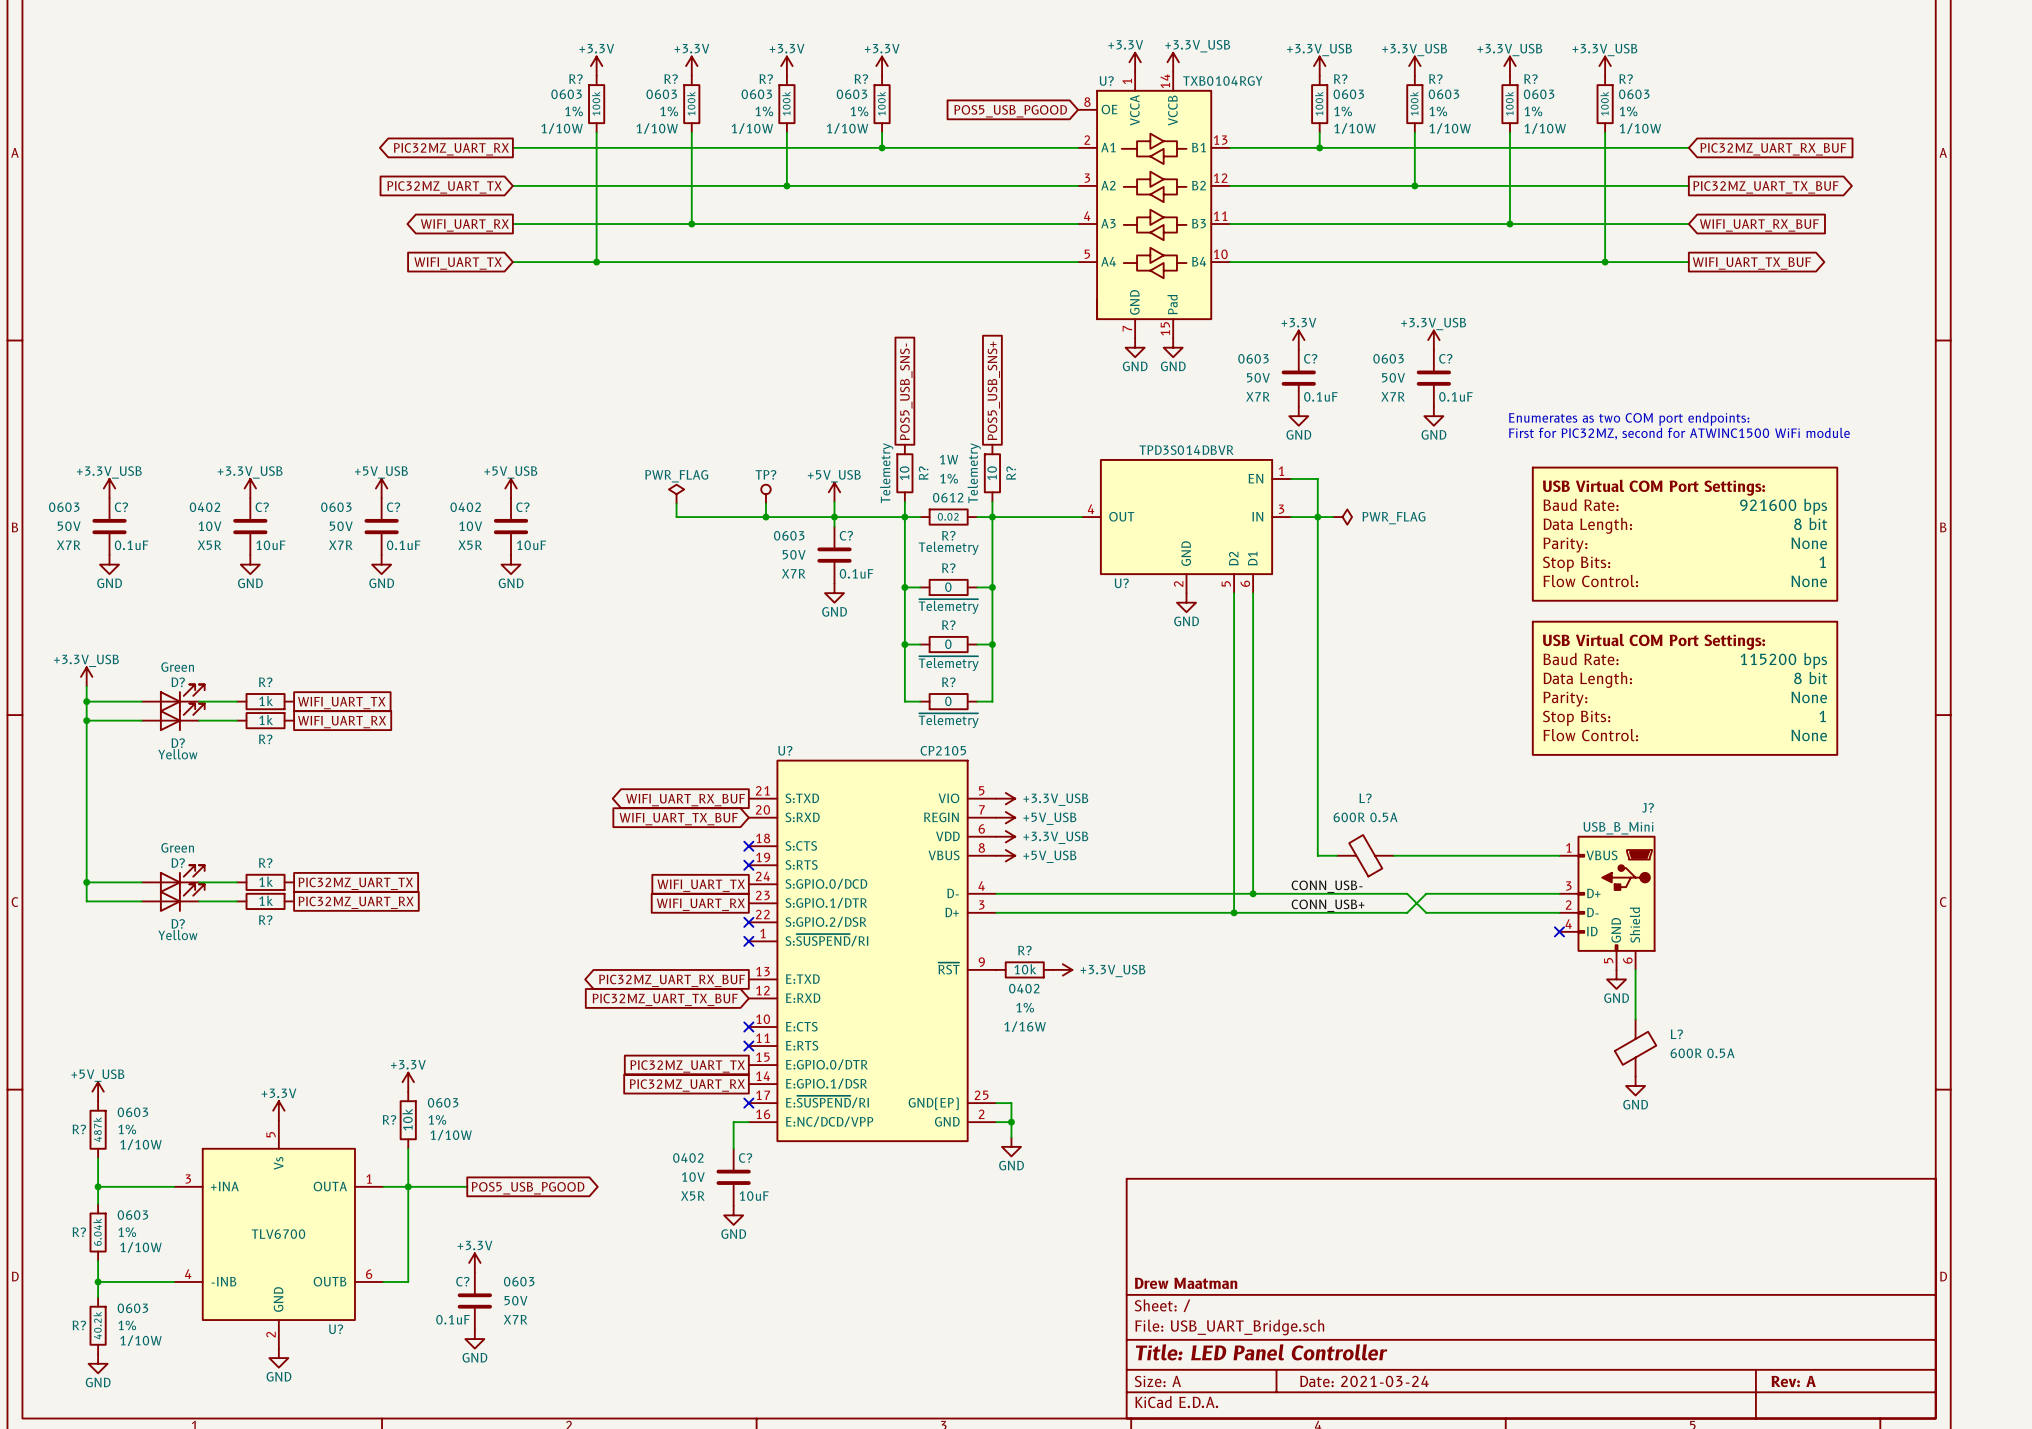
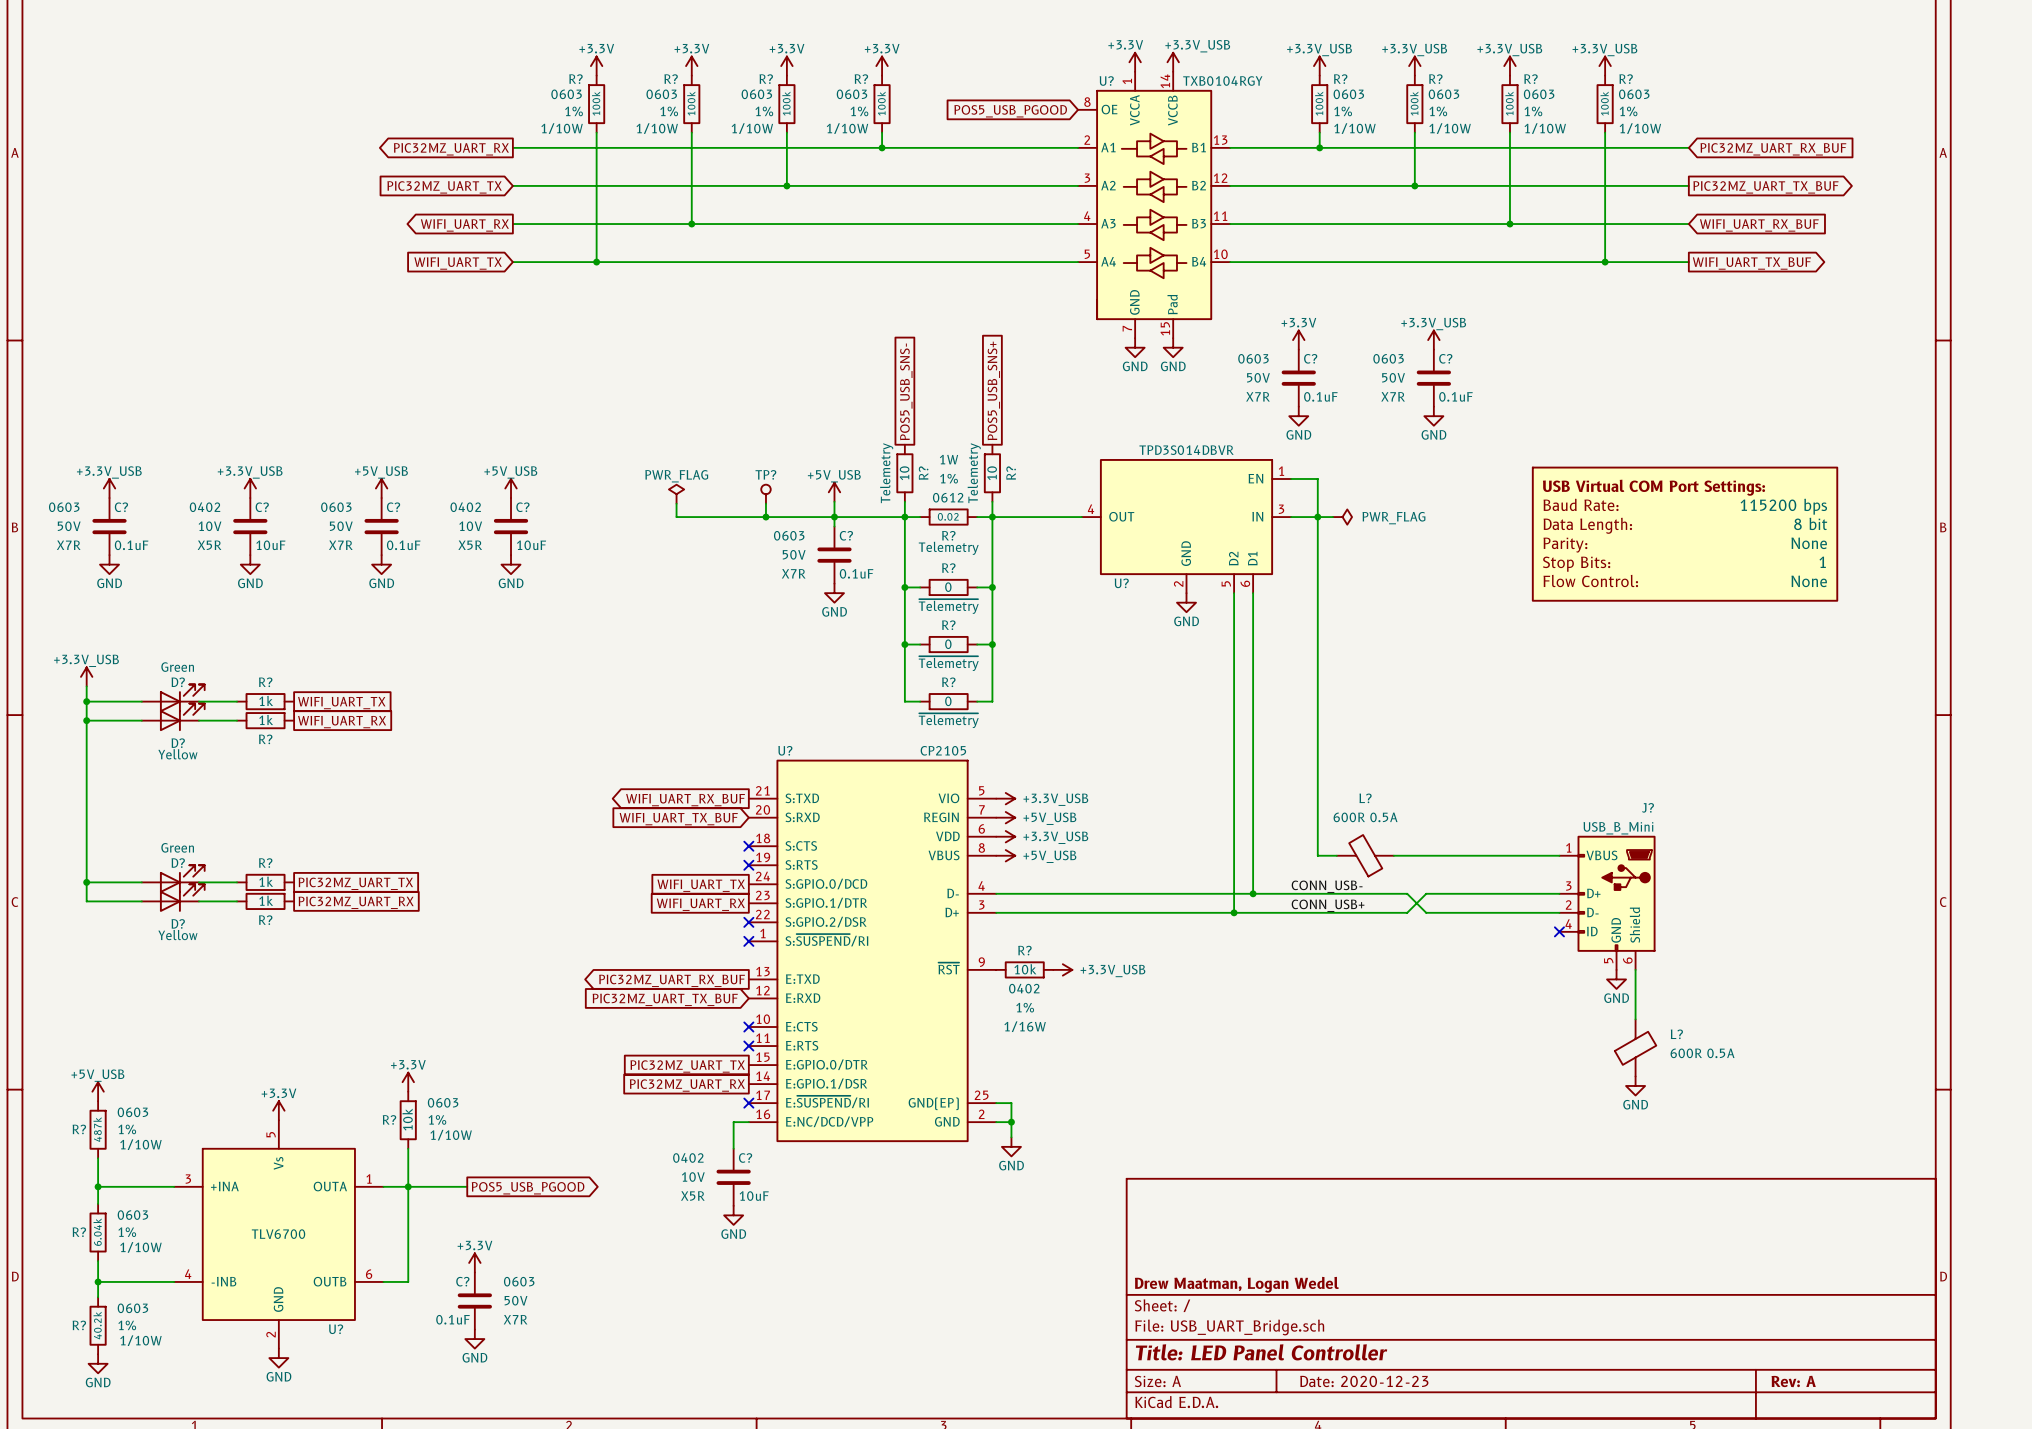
text: Enumerates as two COM port endpoints: (1629, 419) -> none
text: First for PIC32MZ, second for ATWINC1500 WiFi module (1679, 433) -> none
part text: 921600 bps (1783, 506) -> 115200 bps (1783, 506)
part: (1685, 688) -> none
title block: Drew Maatman (1186, 1283) -> Drew Maatman, Logan Wedel (1236, 1284)
title block: Date: 2021-03-24 (1364, 1381) -> Date: 2020-12-23 (1364, 1381)

